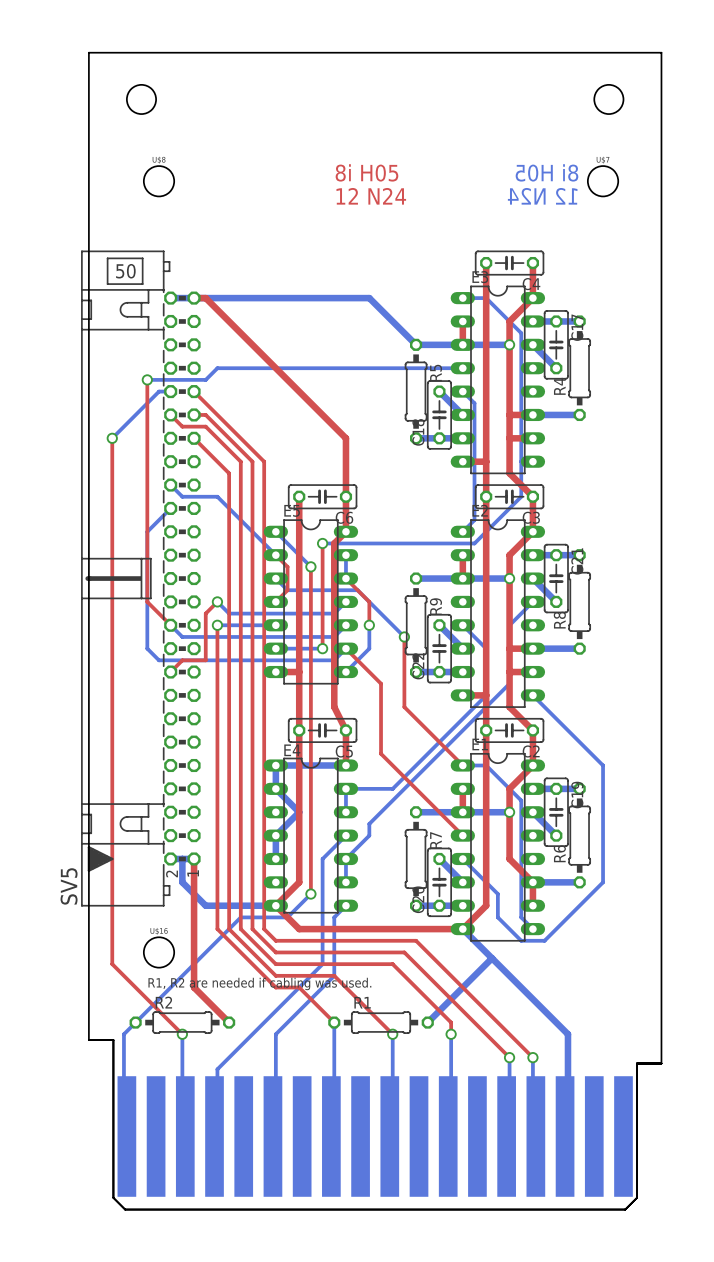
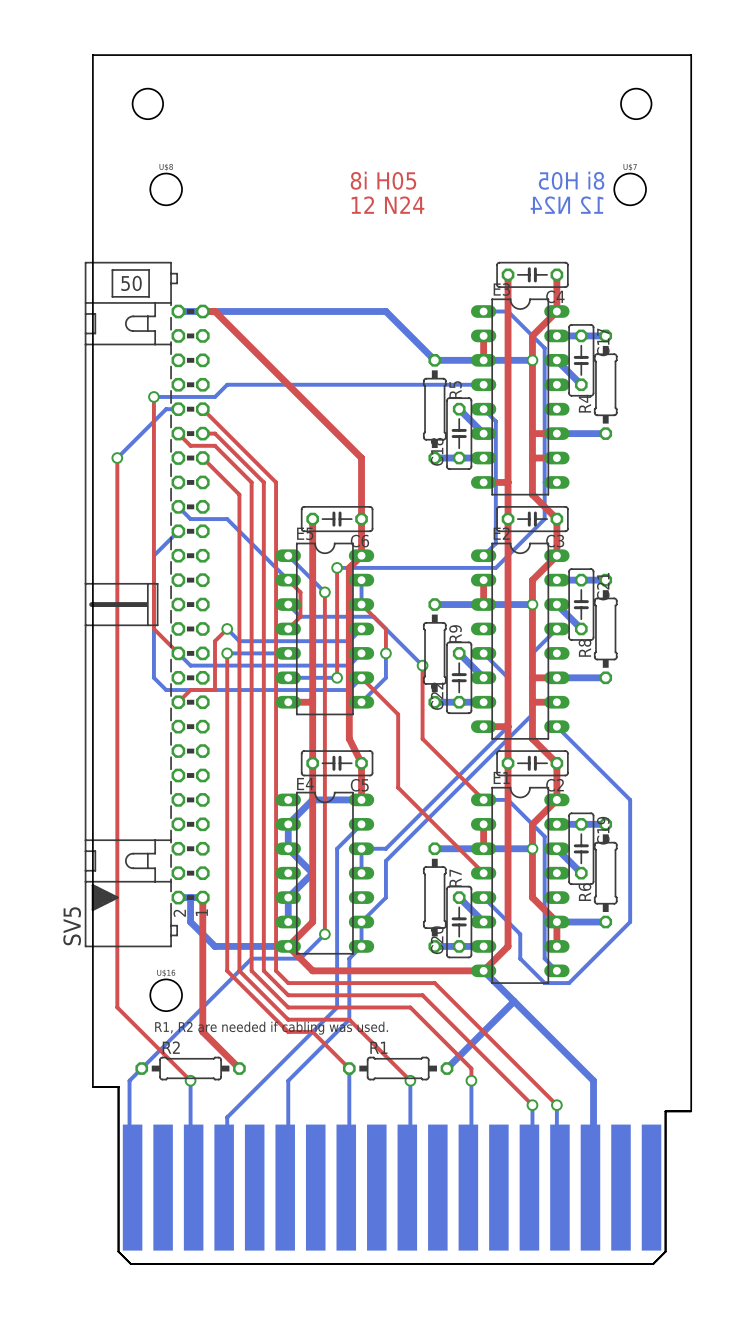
bottom track: (299, 765) (275, 765) (275, 788) (299, 812) (275, 835) (275, 858) -> (312, 799) (288, 824) (288, 848) (312, 873) (288, 897) (288, 922)
bottom track: (392, 788) (345, 788) (345, 812) -> (410, 824) (385, 848) (361, 848) (361, 873)
bottom track: (345, 835) (322, 858) -> (361, 824) (337, 848) (337, 897)
bottom track: (369, 835) (345, 858) (345, 882) -> (385, 873) (385, 897) (361, 922) (361, 946)

